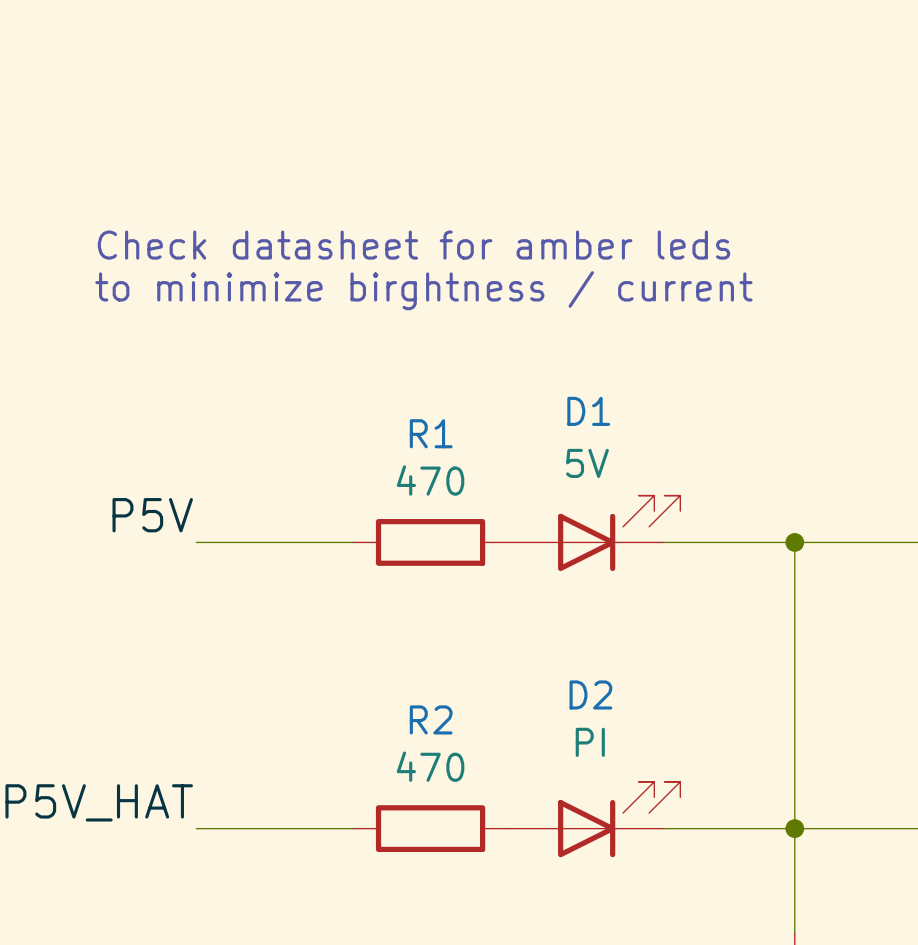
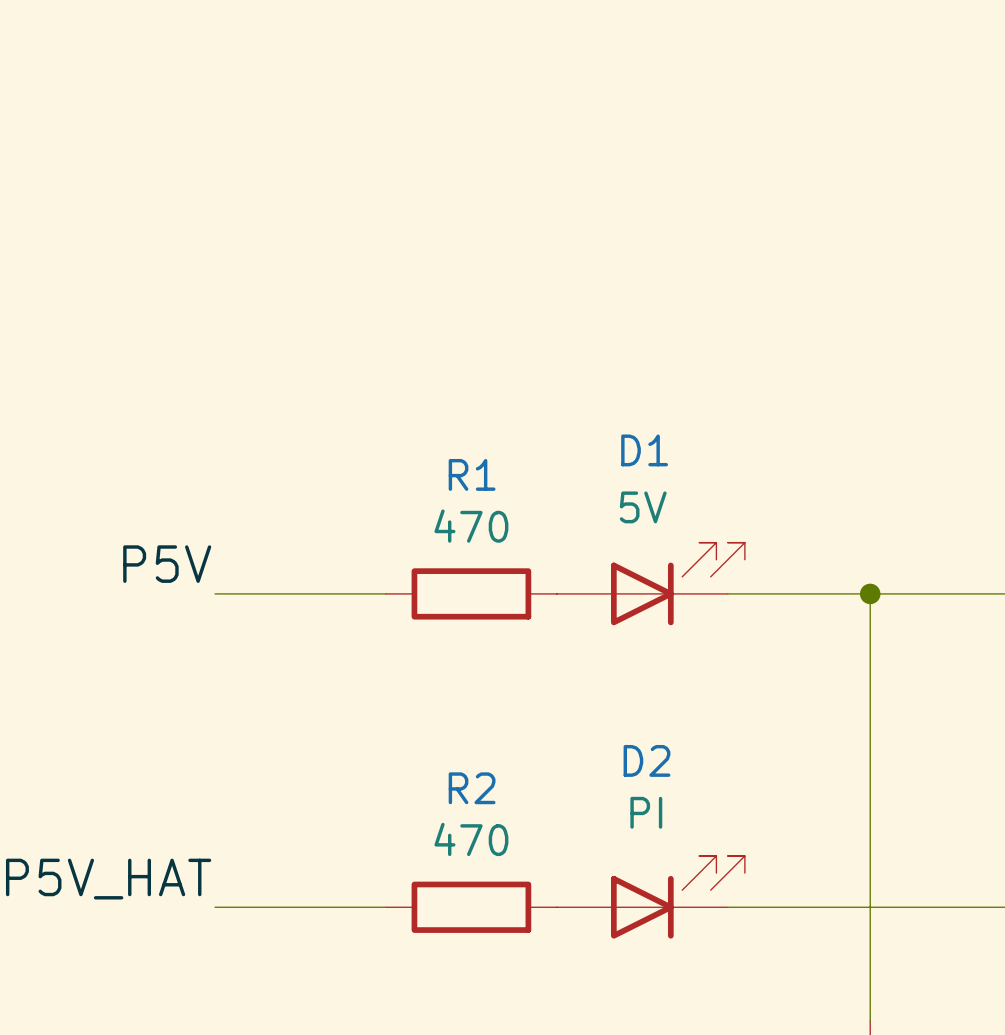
text: Check datasheet for amber leds (414, 245) -> none
text: to minimize birghtness / current (423, 290) -> none
junction: (794, 828) -> none

